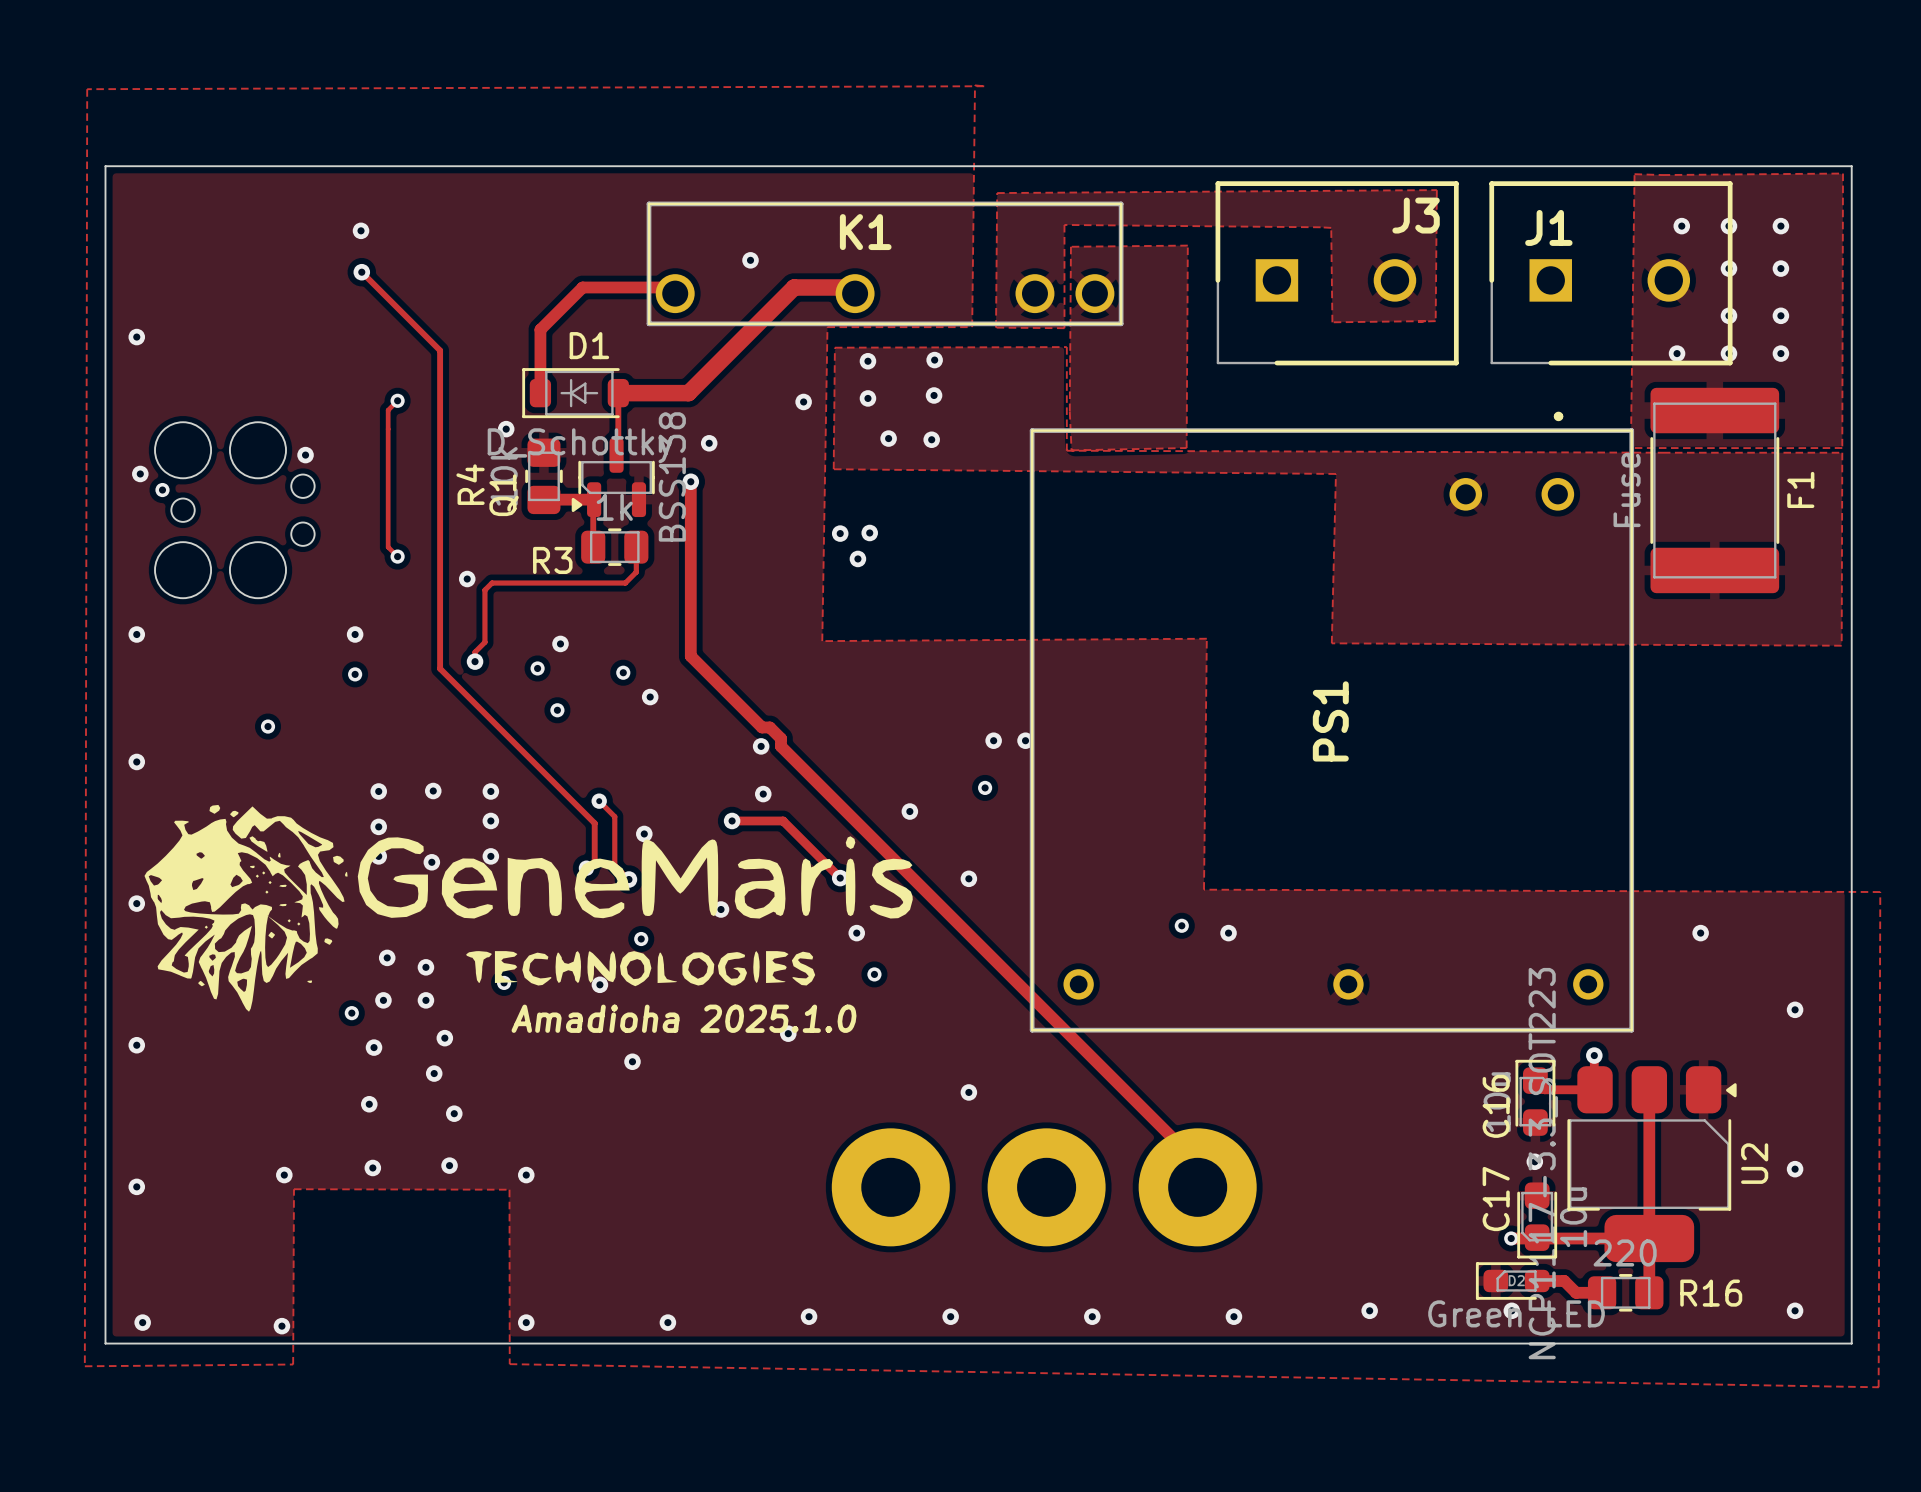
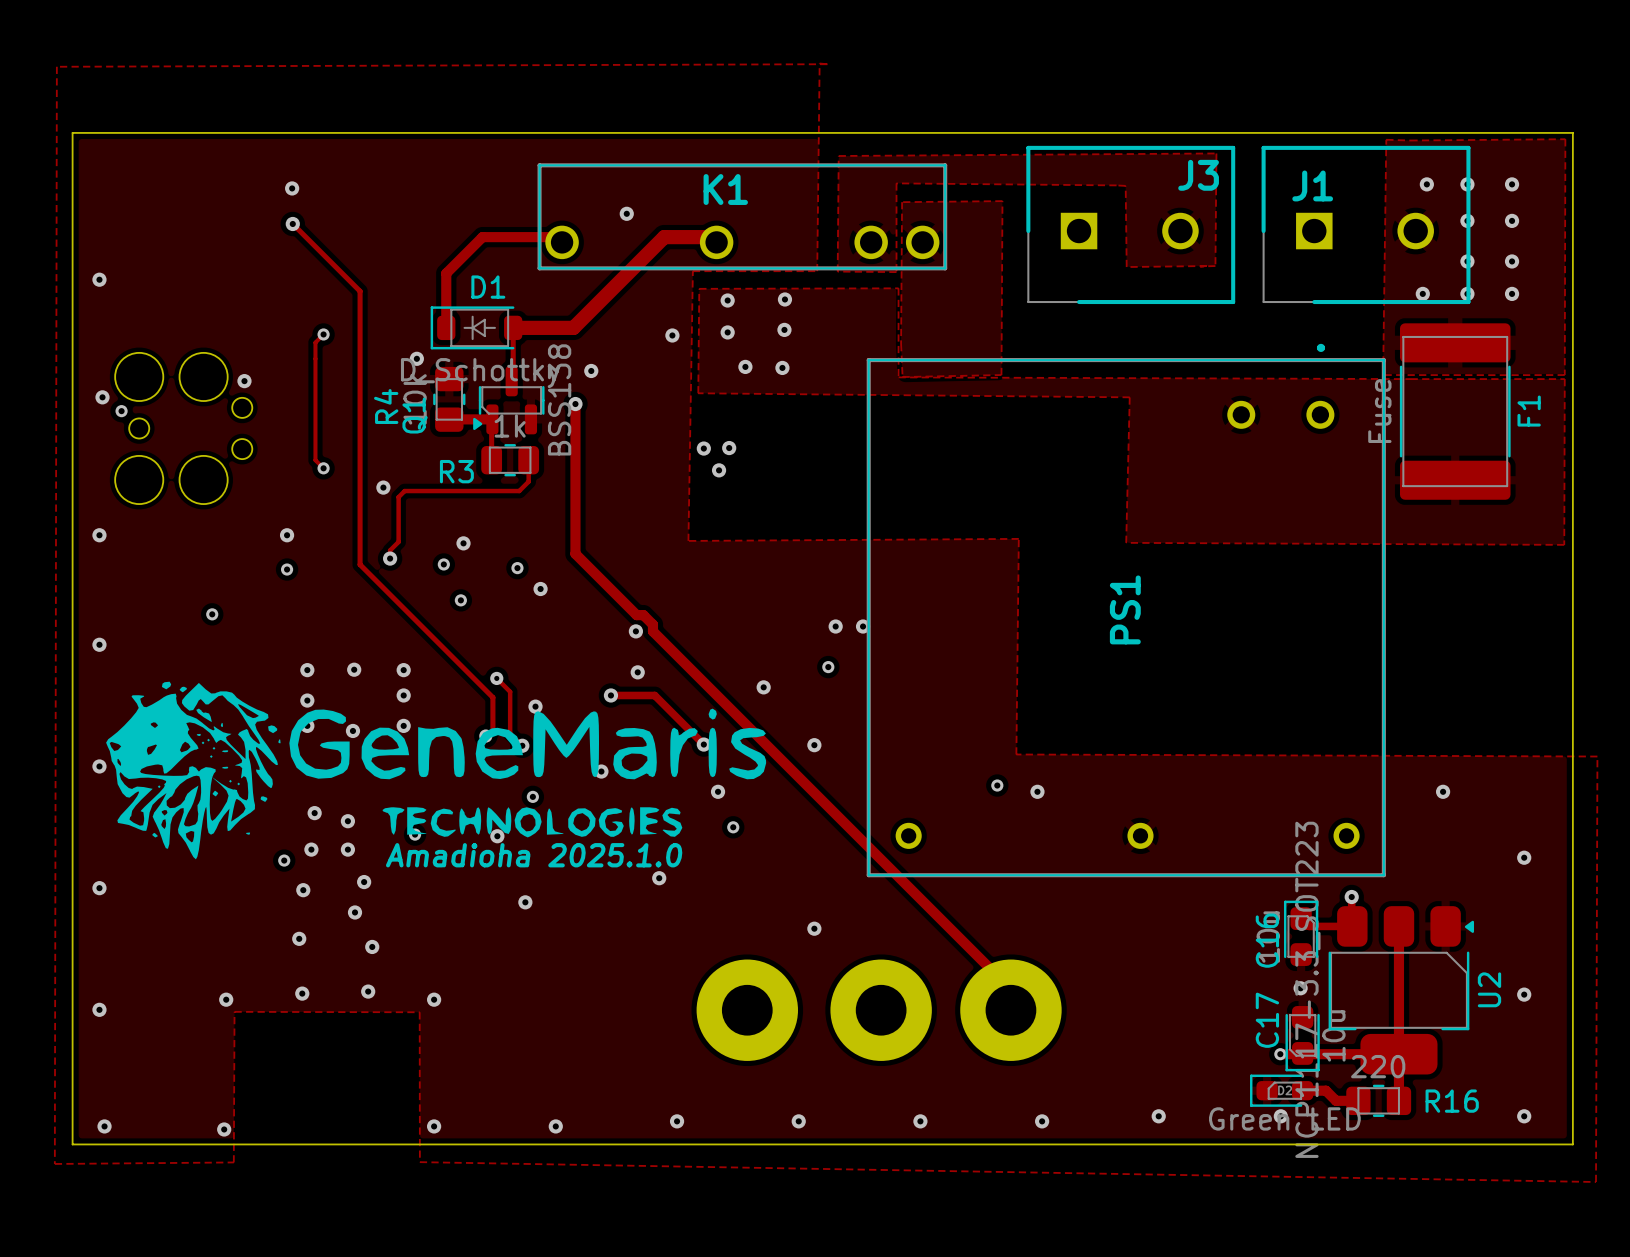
text position: Amadioha 2025.1.0 (684, 1018) -> Amadioha 2025.1.0 (534, 855)

